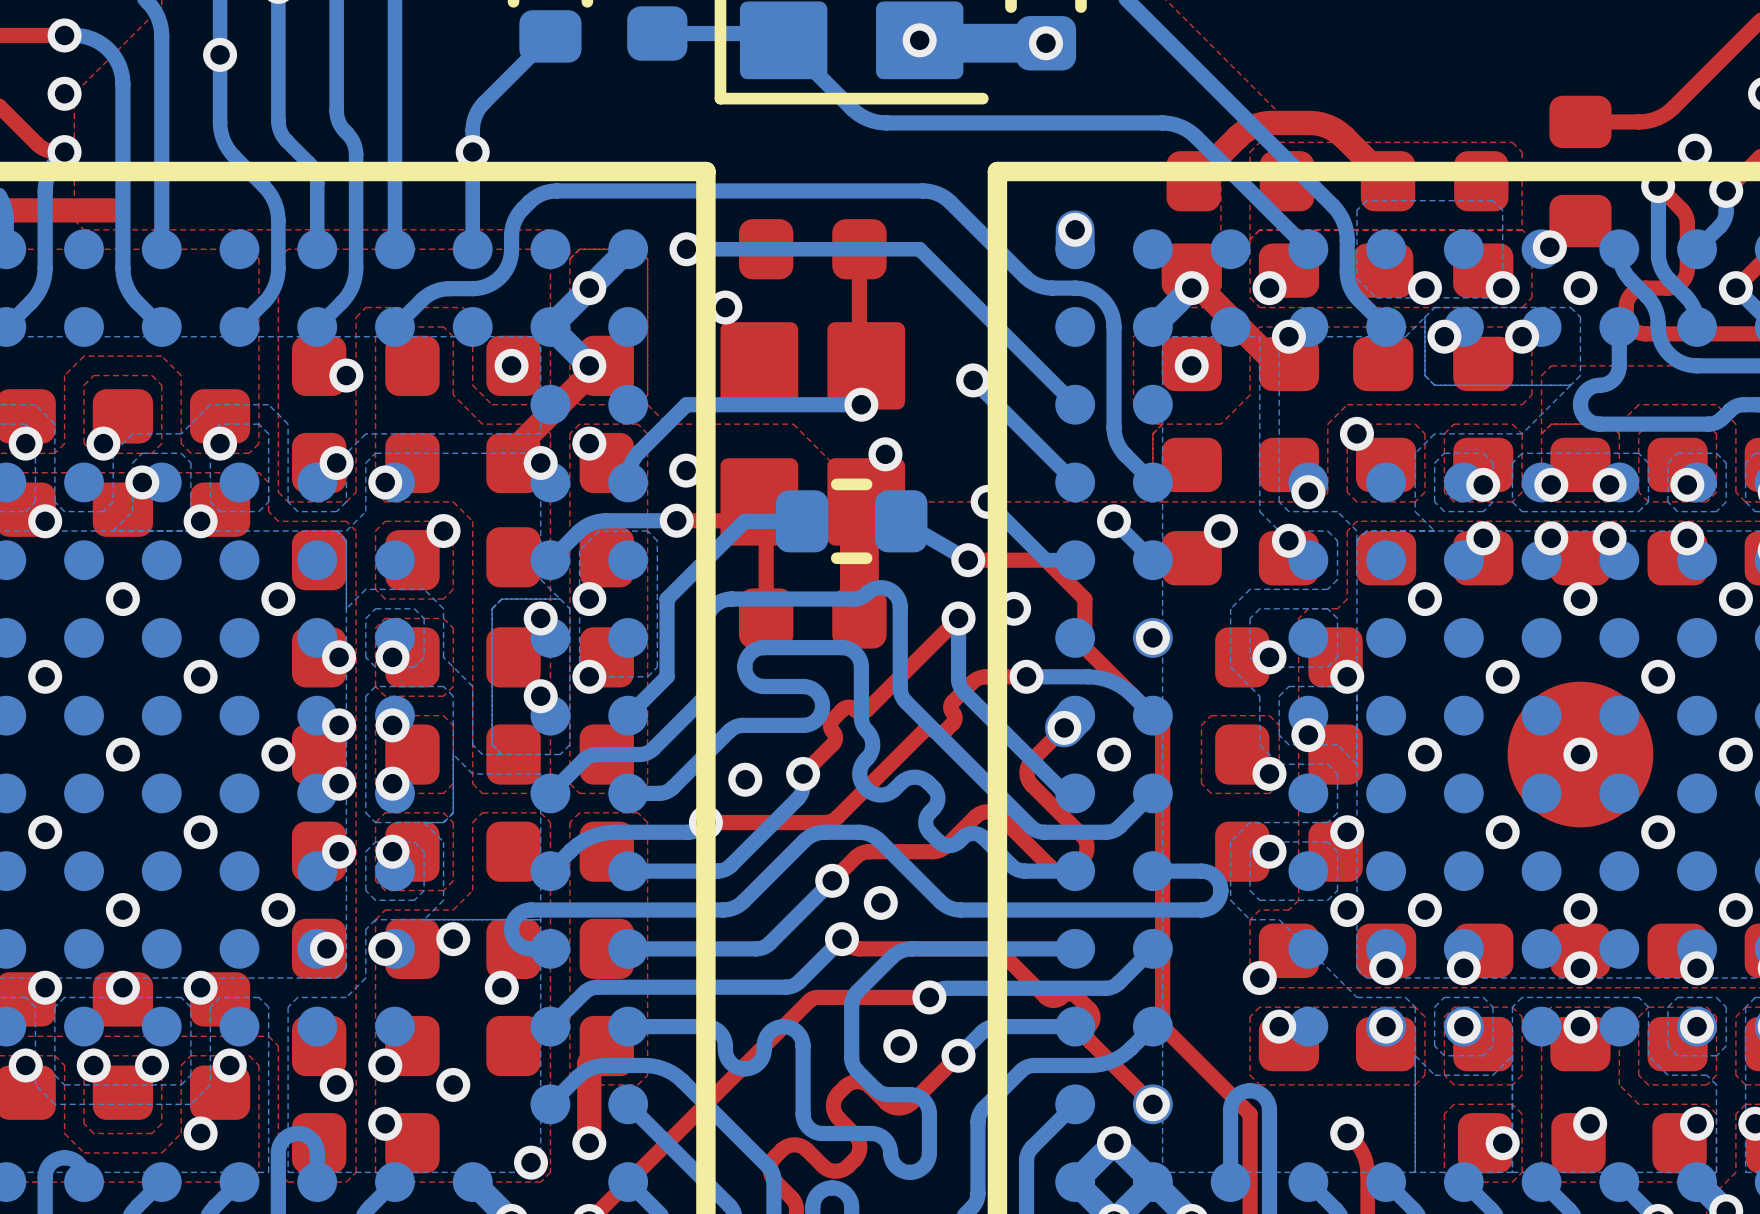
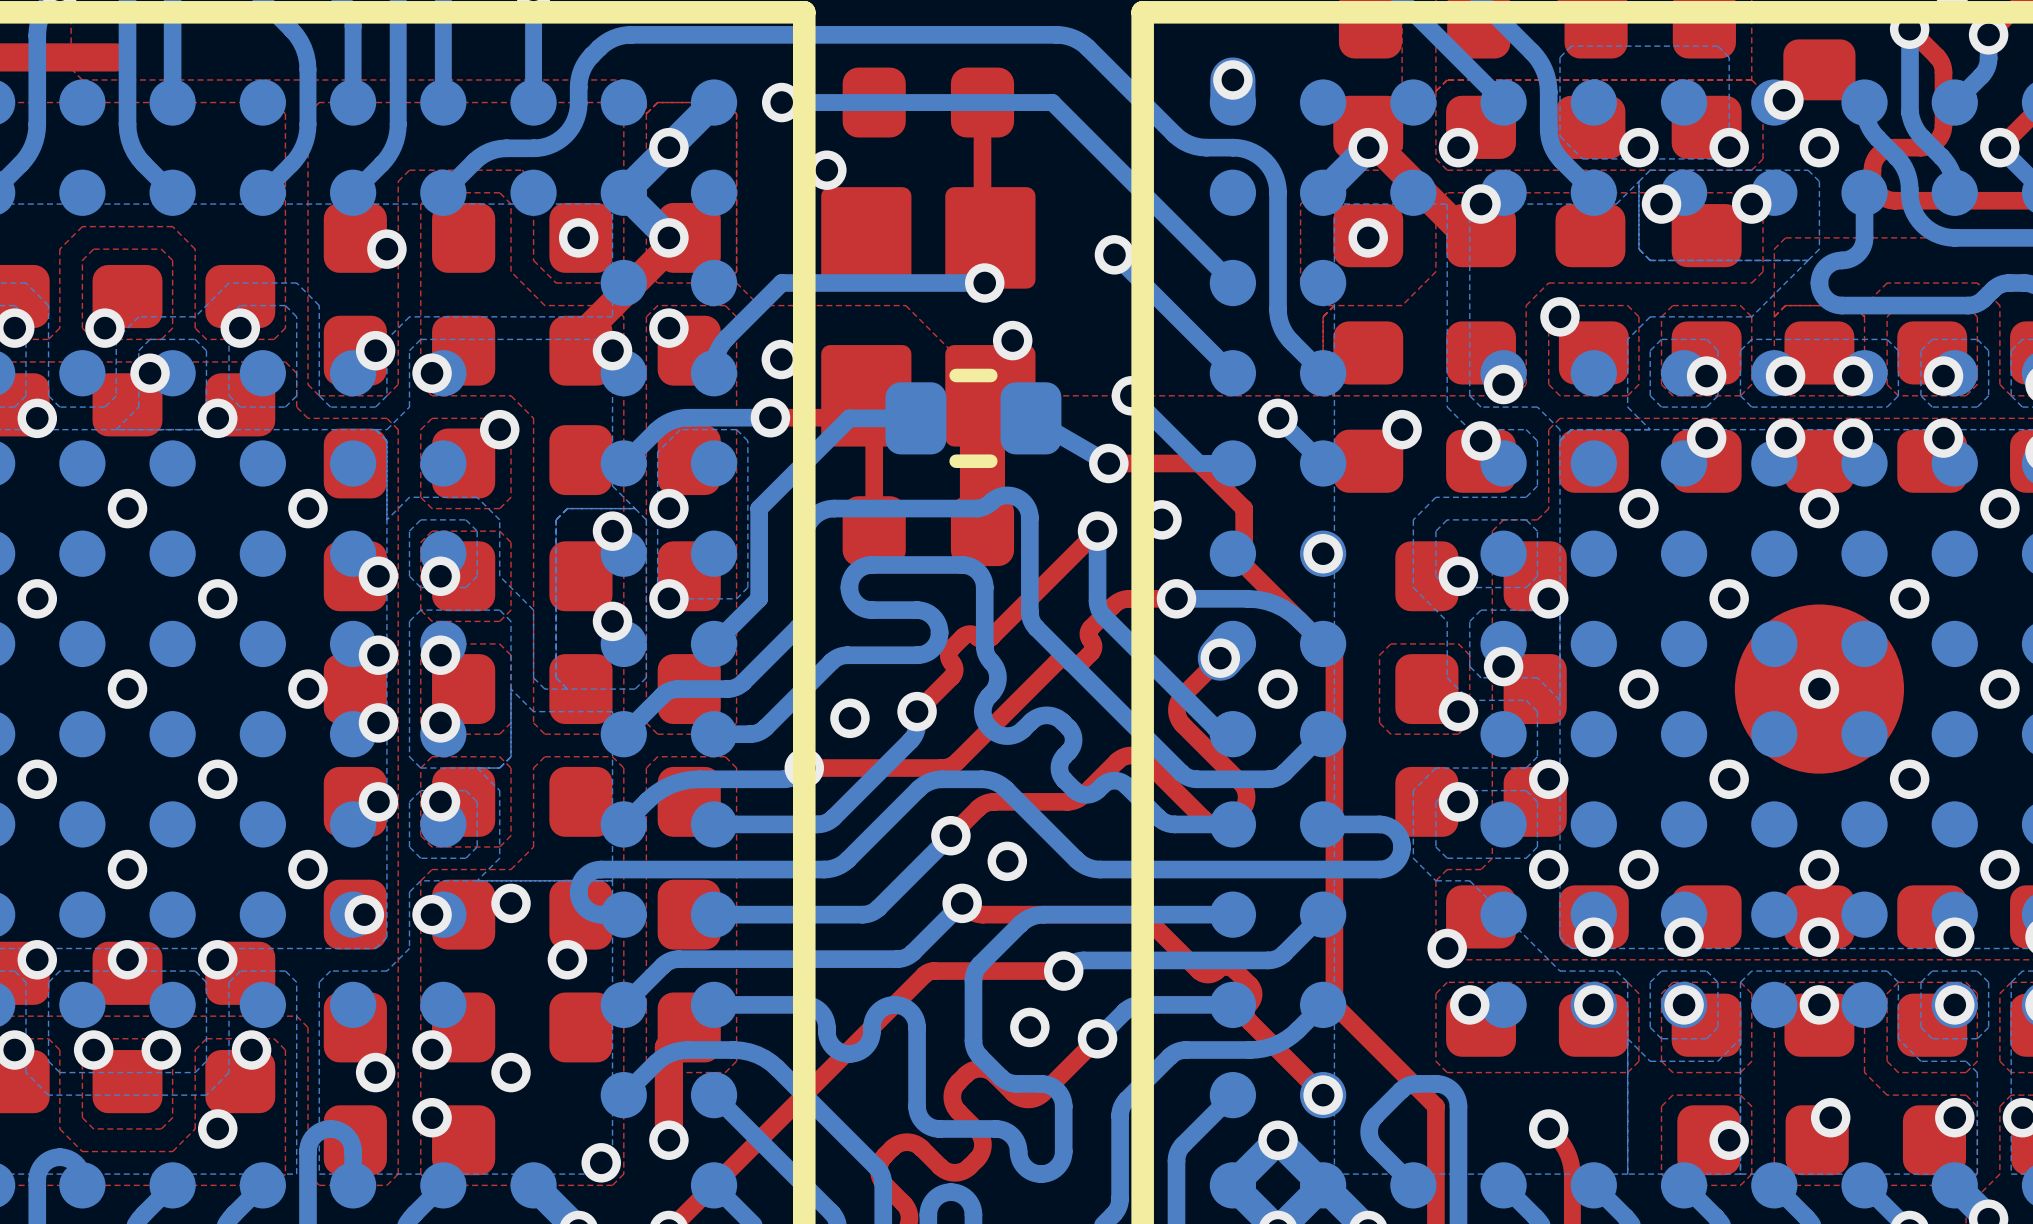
bottom track: (1269, 1114) (1266, 1100) (1257, 1092) (1245, 1091) (1233, 1100) (1230, 1110) (1230, 1182) -> (1458, 1106) (1455, 1095) (1447, 1086) (1438, 1084) (1414, 1084) (1403, 1088) (1372, 1120) (1369, 1131) (1372, 1143) (1413, 1185)

